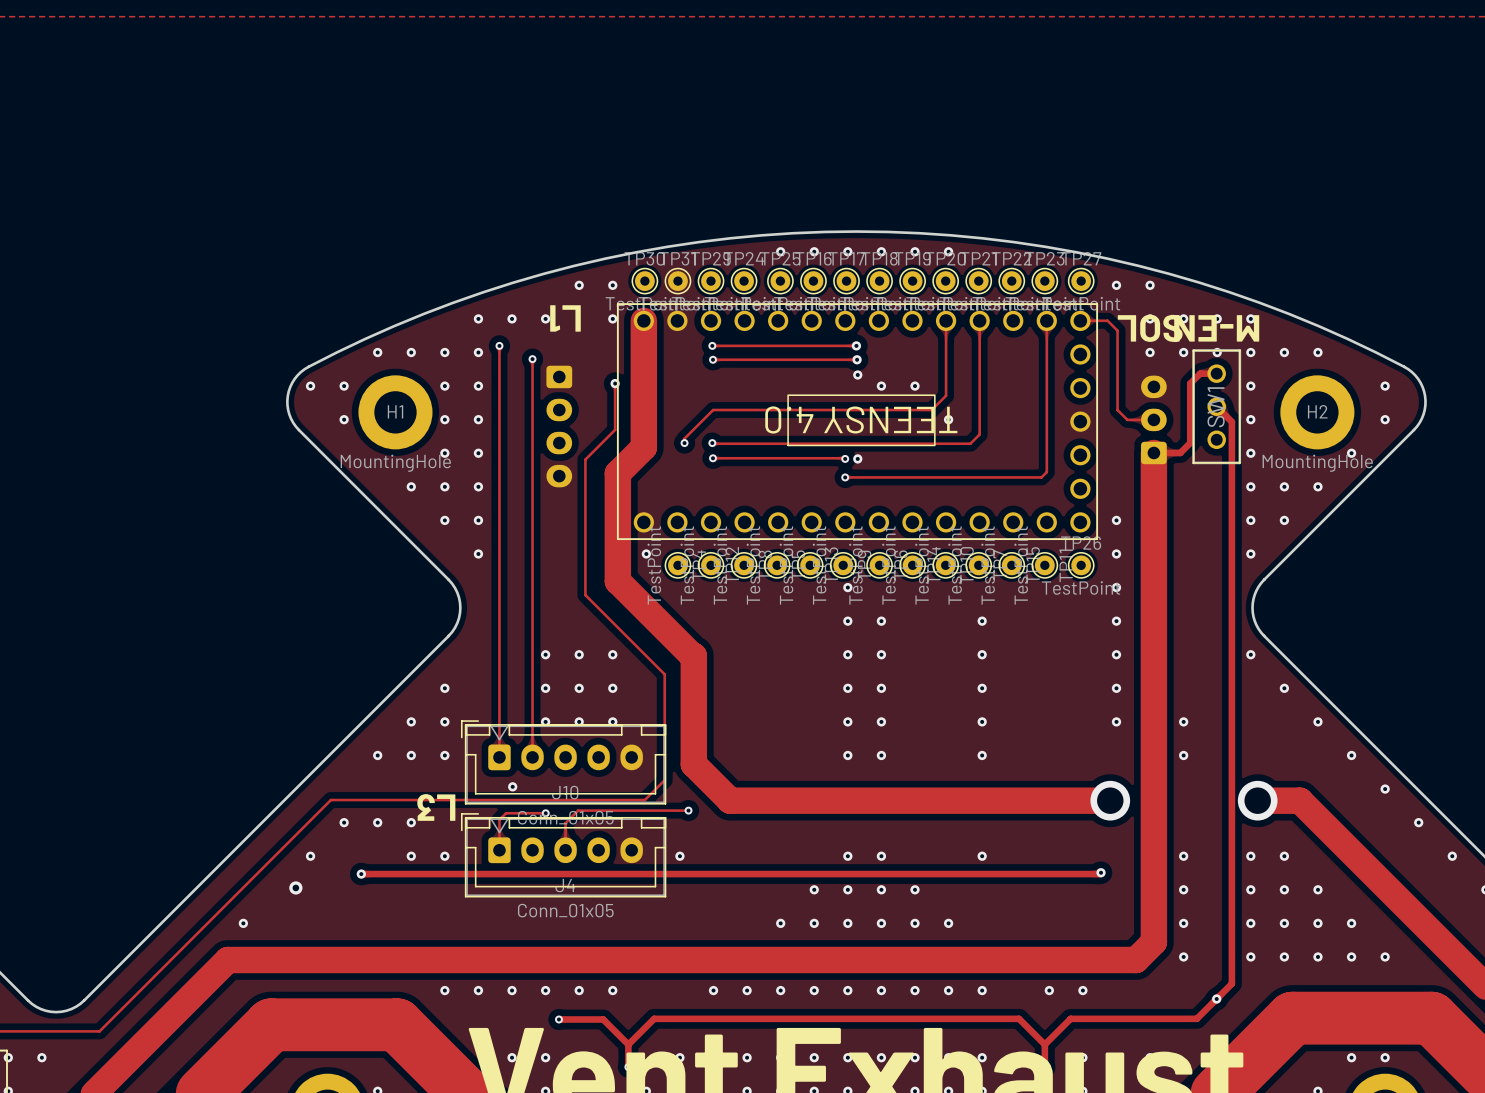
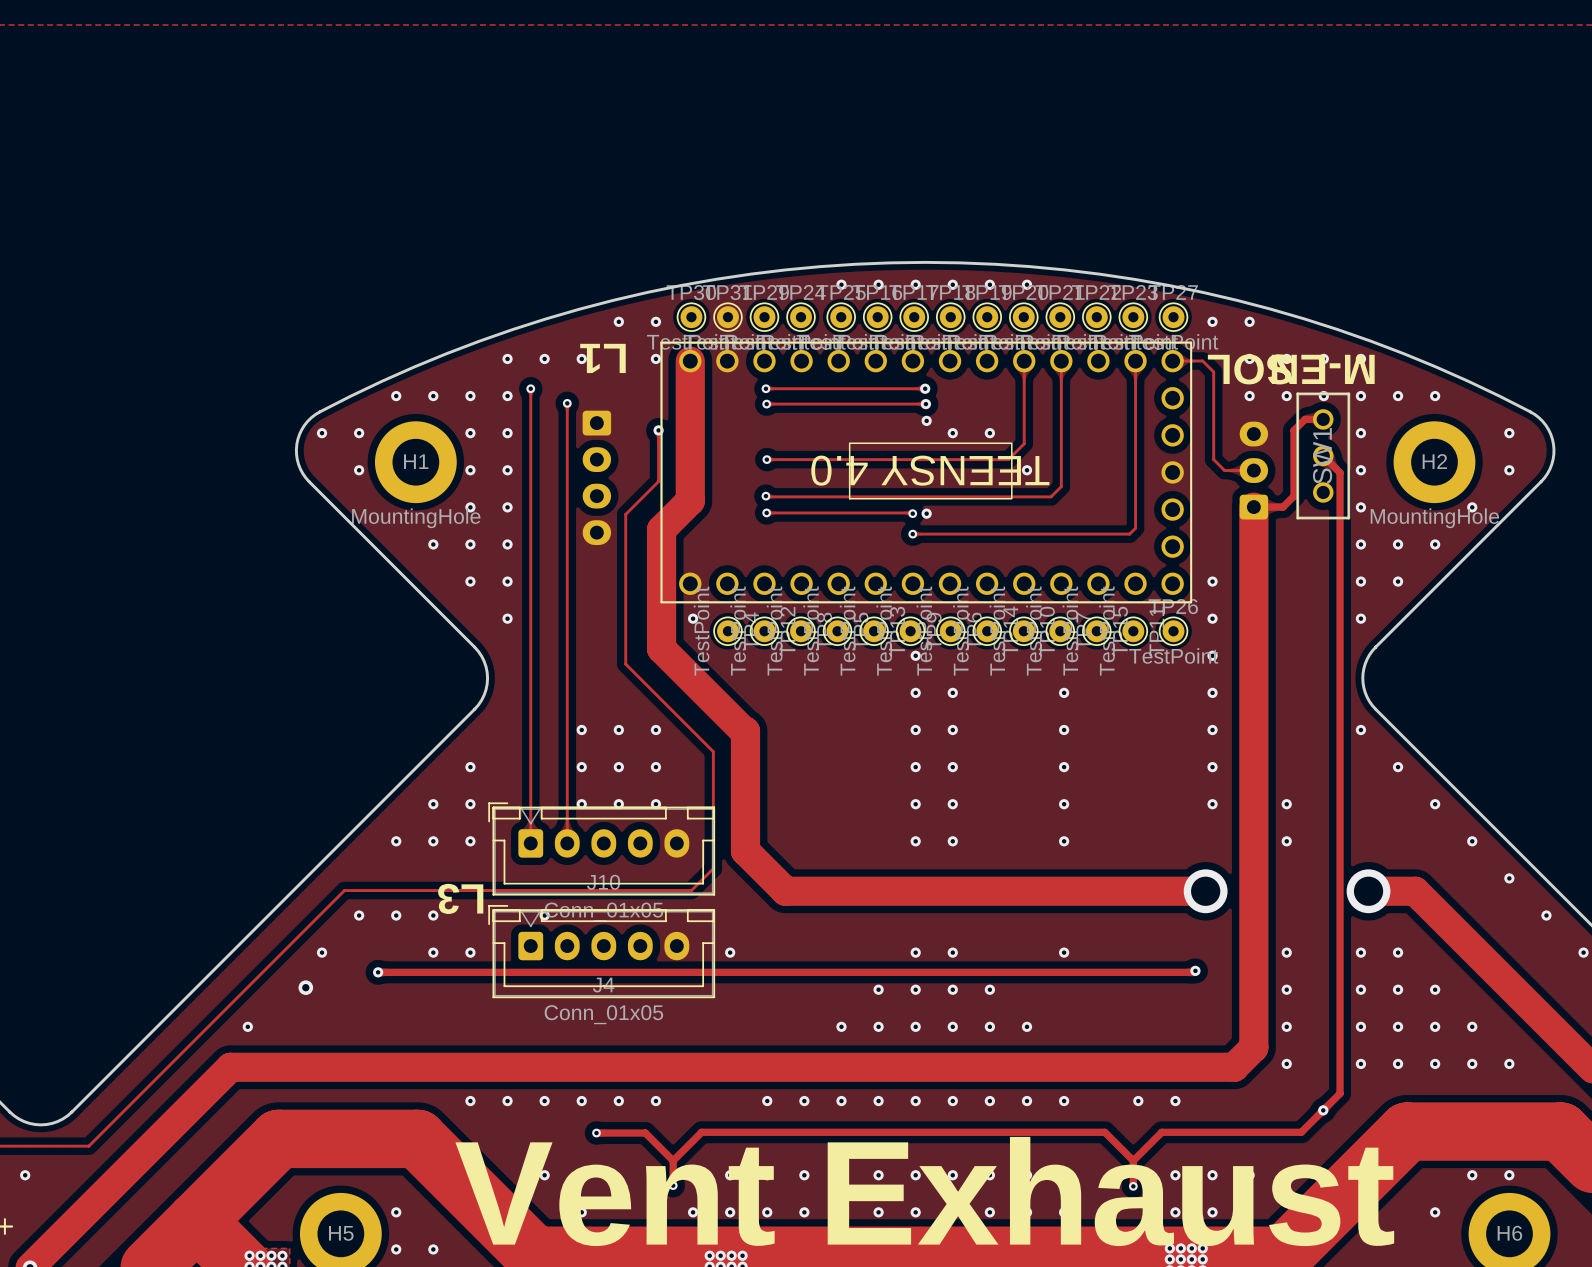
track: (713, 410) (684, 438) (684, 443) -> none
via position: (684, 443) -> (766, 459)
via position: (512, 786) -> (544, 915)
track: (688, 810) (578, 810) (565, 823) (565, 850) -> none
via: (688, 810) -> none
track: (545, 813) (506, 813) (499, 819) (499, 850) -> none
via: (545, 813) -> none

